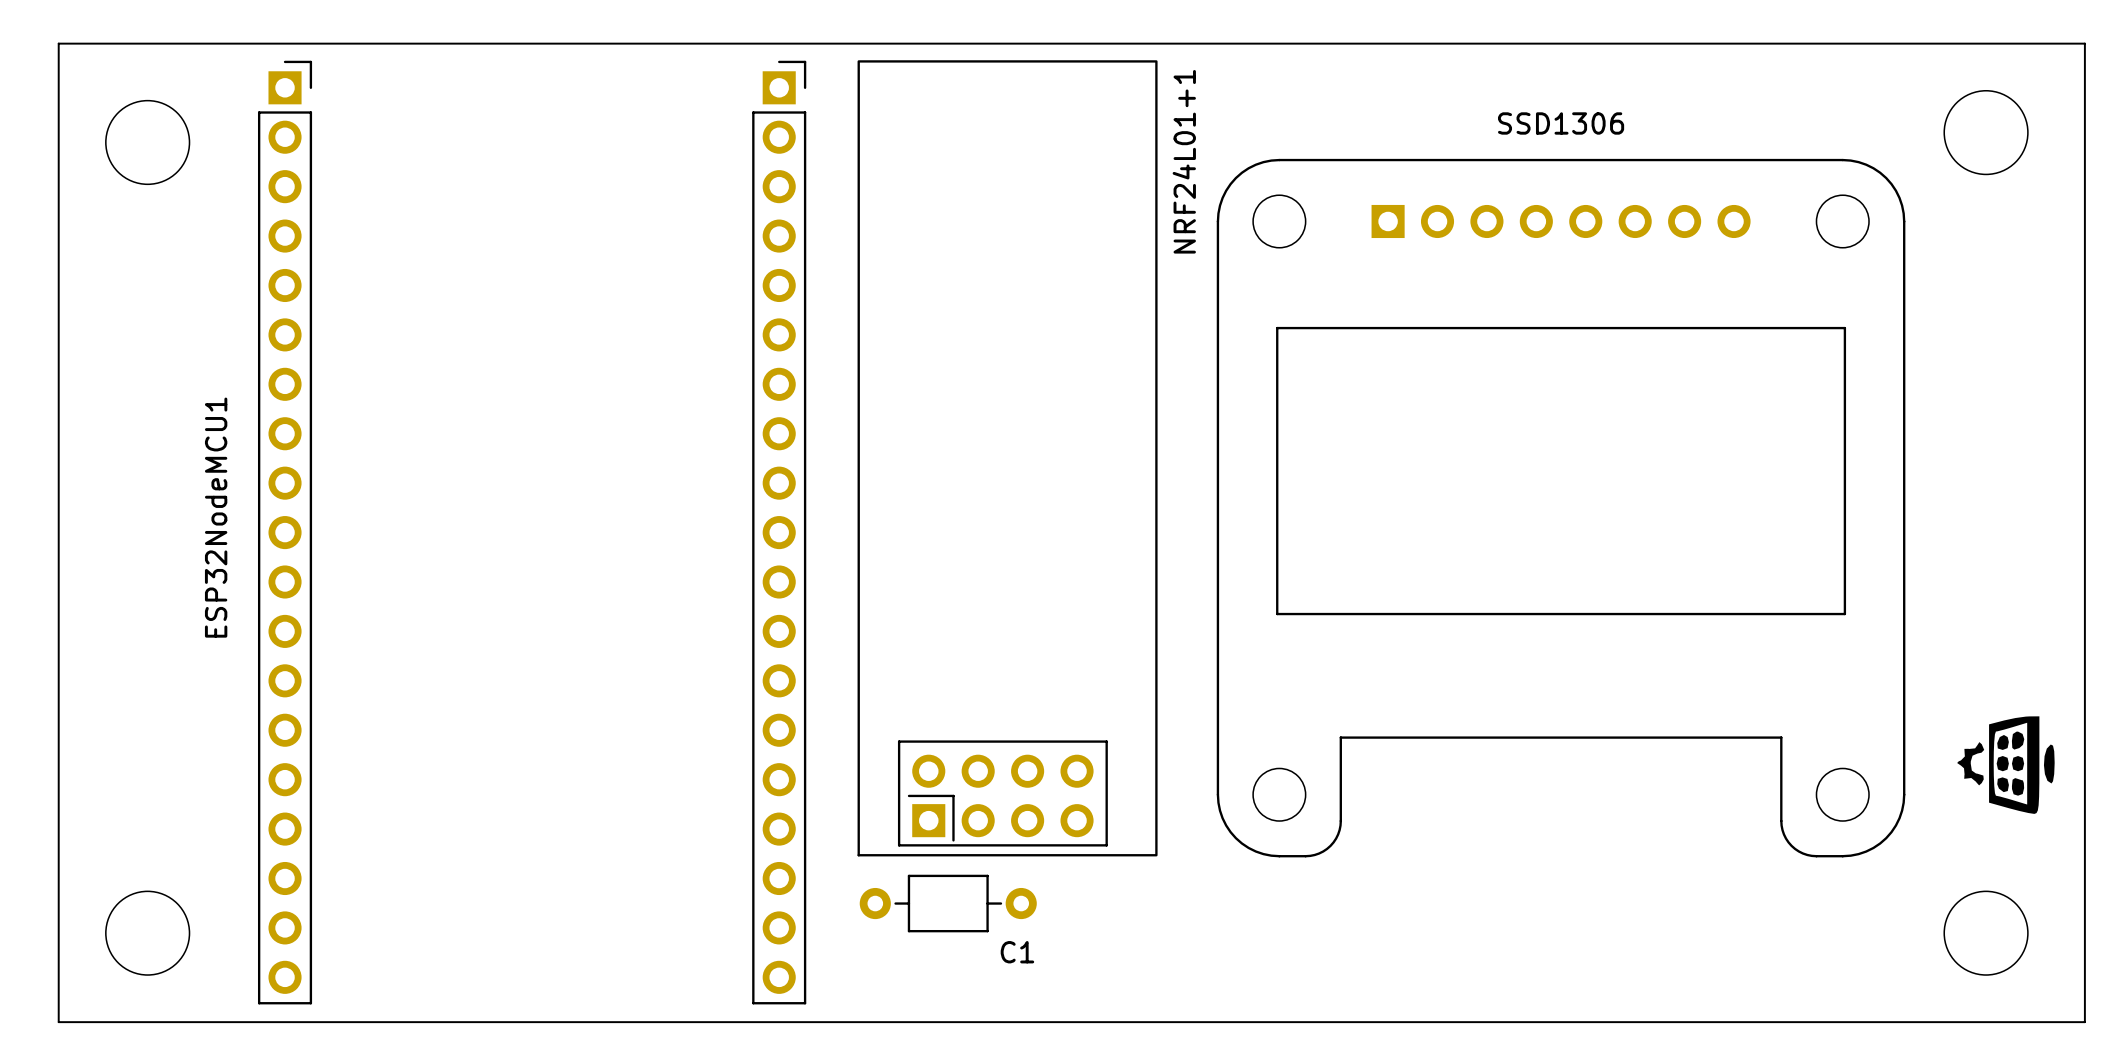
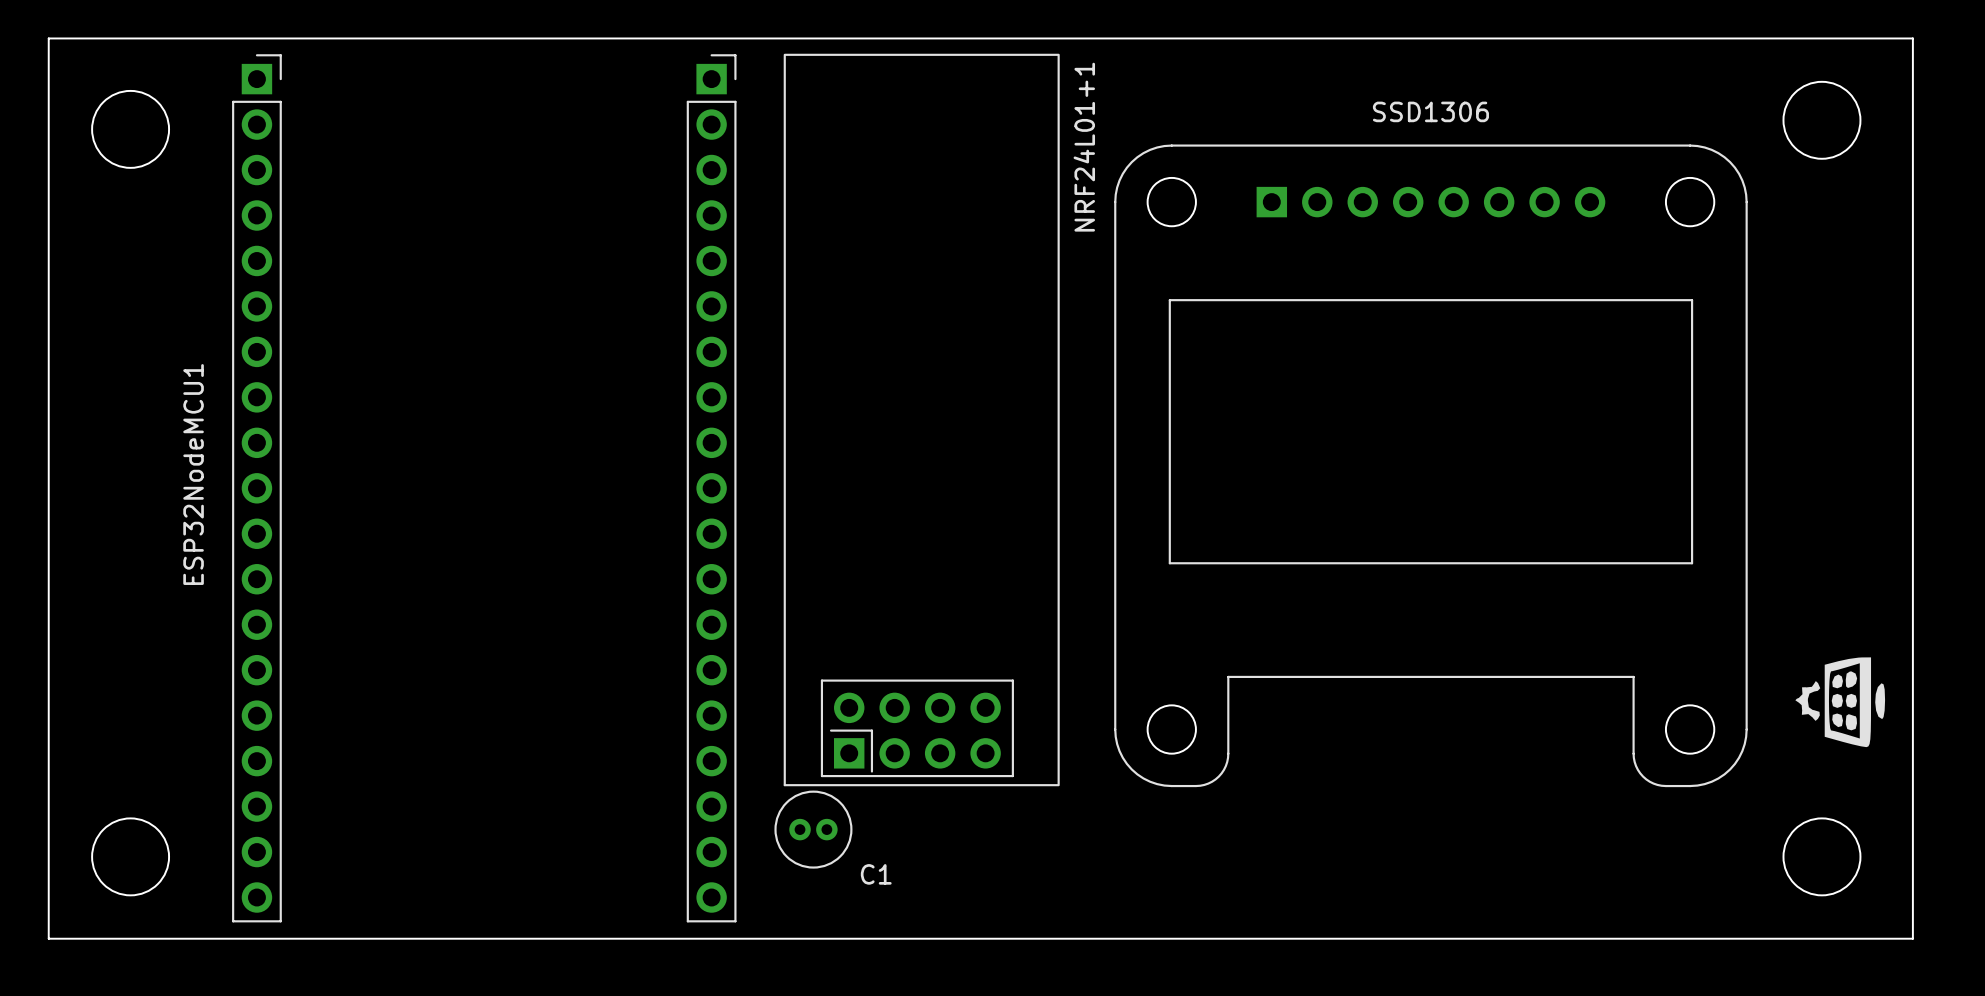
C1 footprint: [859, 874, 1037, 933] -> [774, 790, 853, 869]

